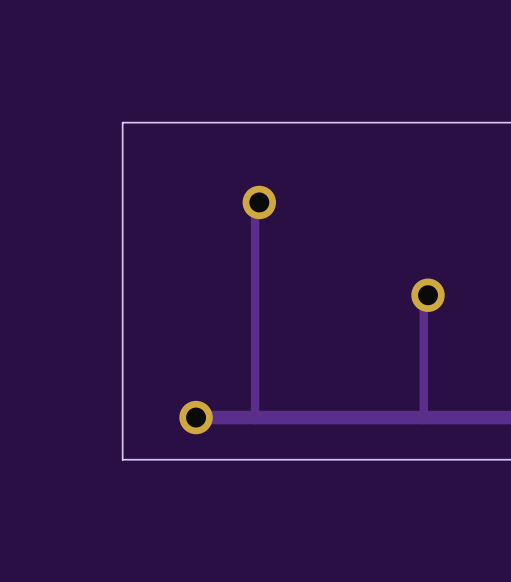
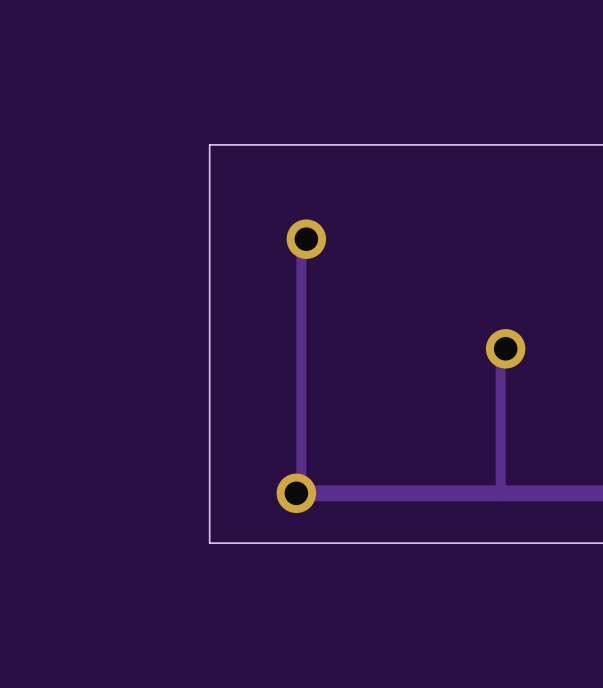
board edge: (177, 122) (122, 122) (122, 459) (177, 459) -> (209, 144) (209, 543)
via position: (196, 417) -> (296, 493)
track: (250, 417) (196, 417) -> none

